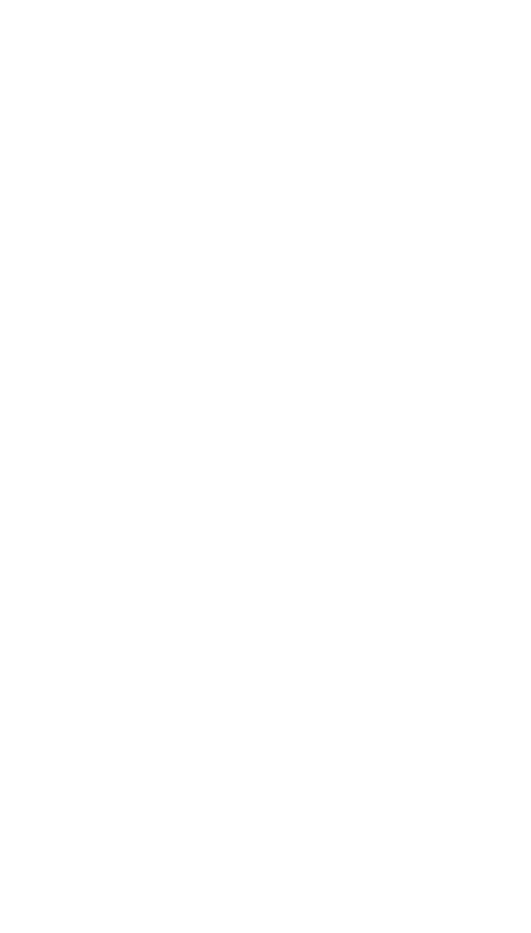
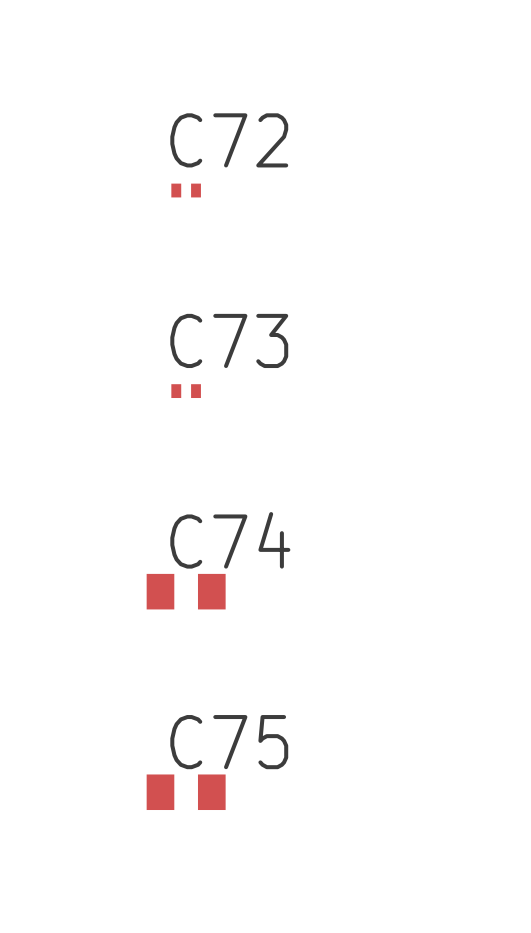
C72: none -> (186, 190)
C73: none -> (186, 391)
C74: none -> (186, 591)
C75: none -> (186, 792)

